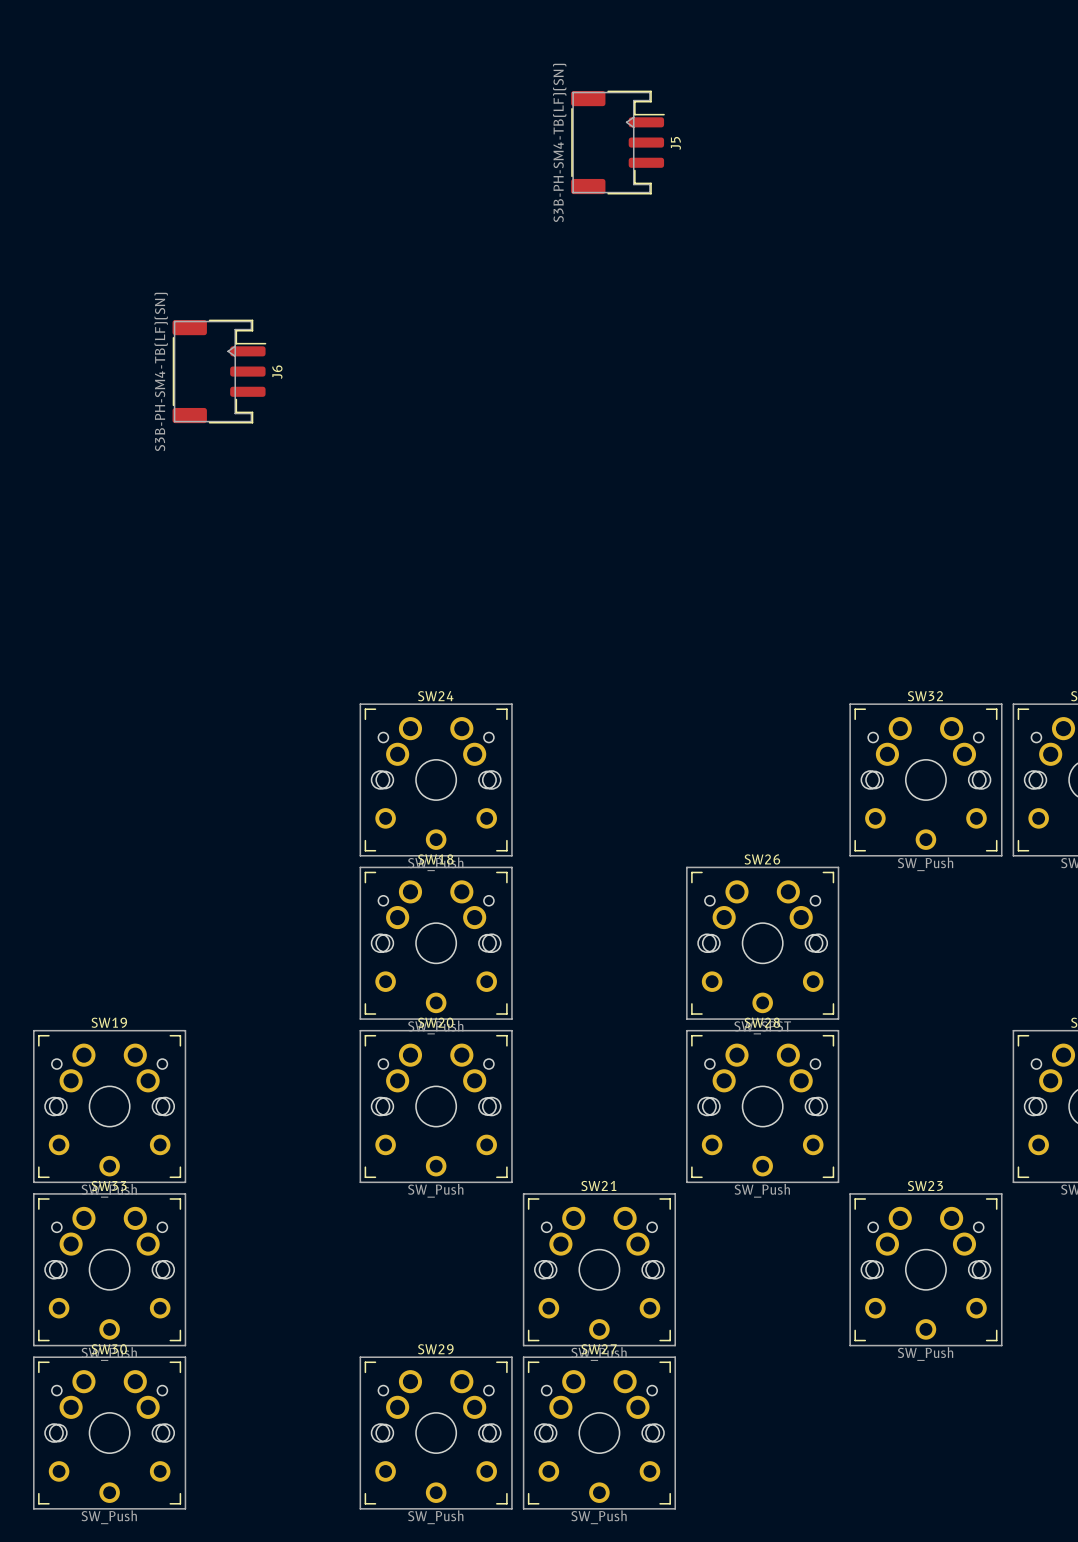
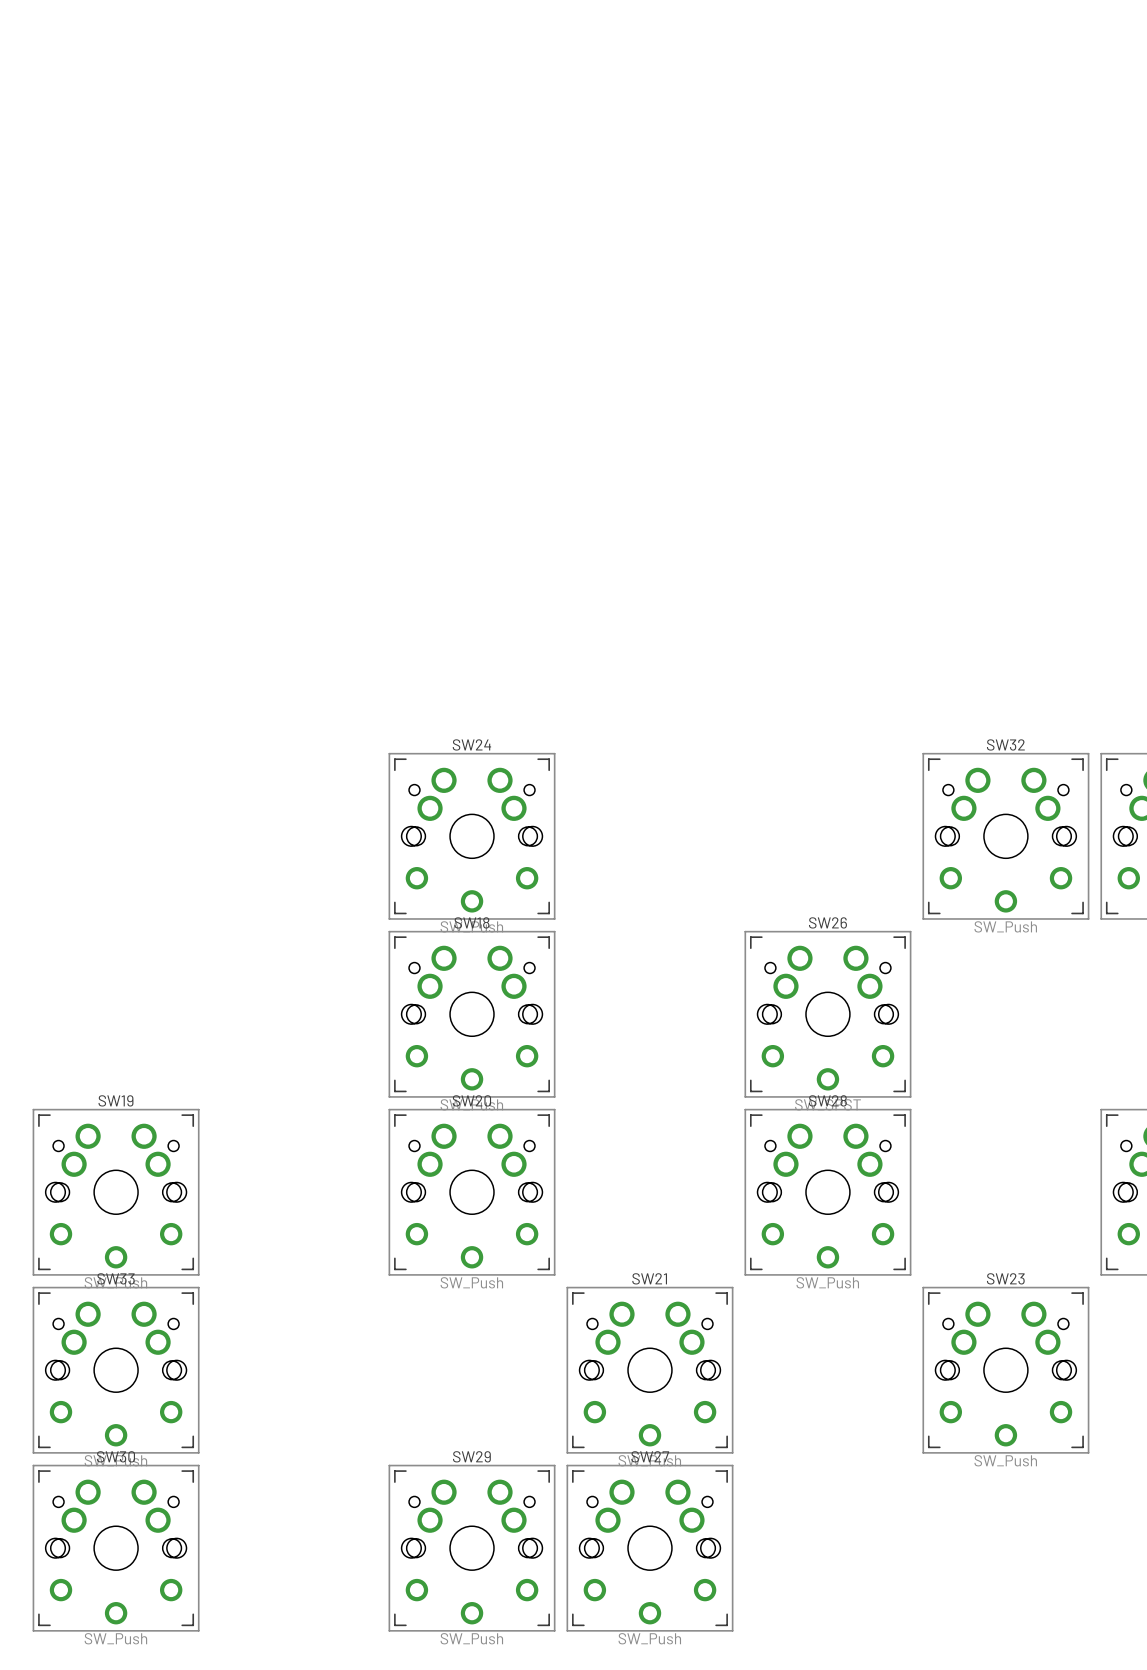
J5: S3B-PH-SM4-TB(LF)(SN) (617, 142) -> none
J6: S3B-PH-SM4-TB(LF)(SN) (219, 371) -> none

